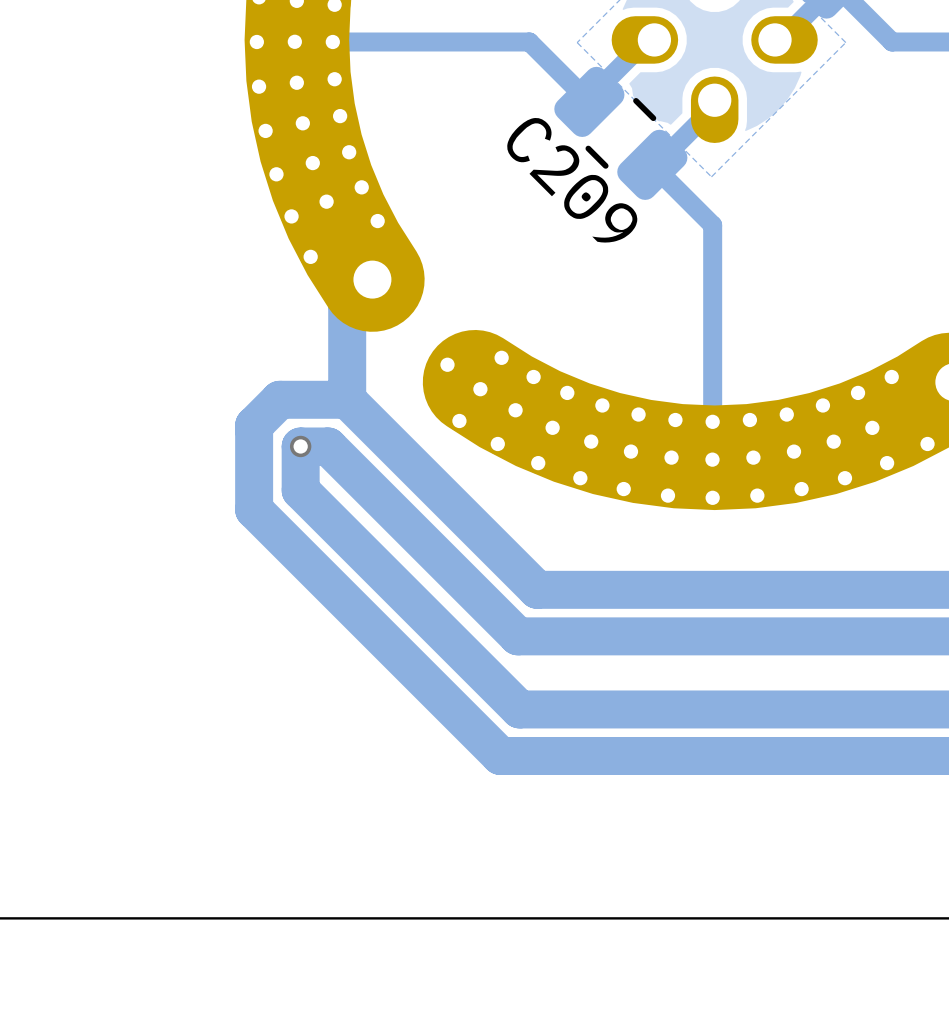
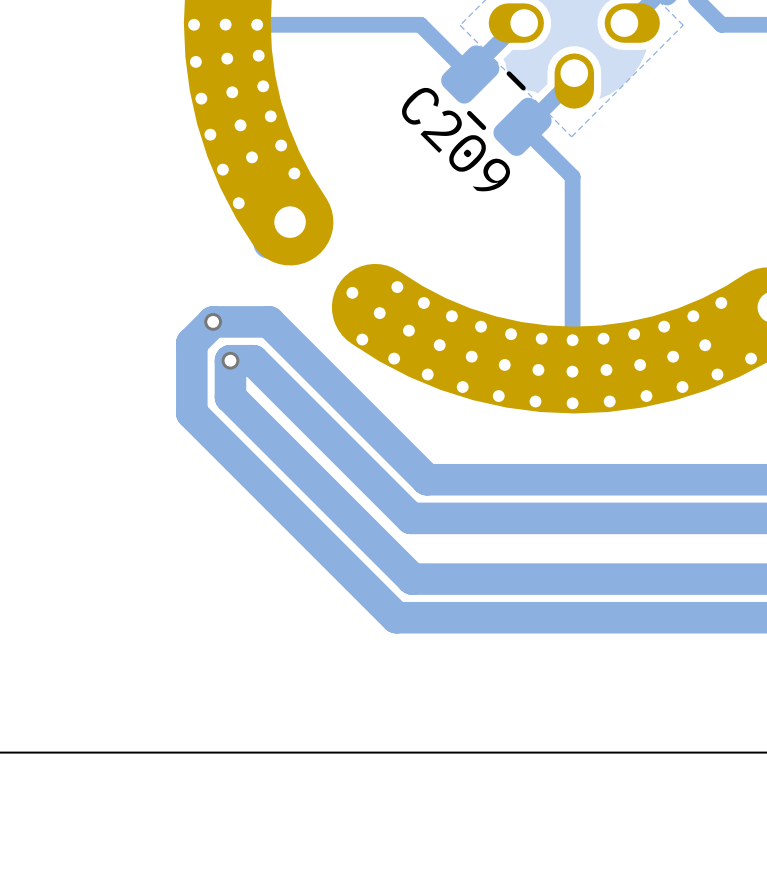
track: (347, 304) (347, 399) -> none
via: none -> (213, 321)

